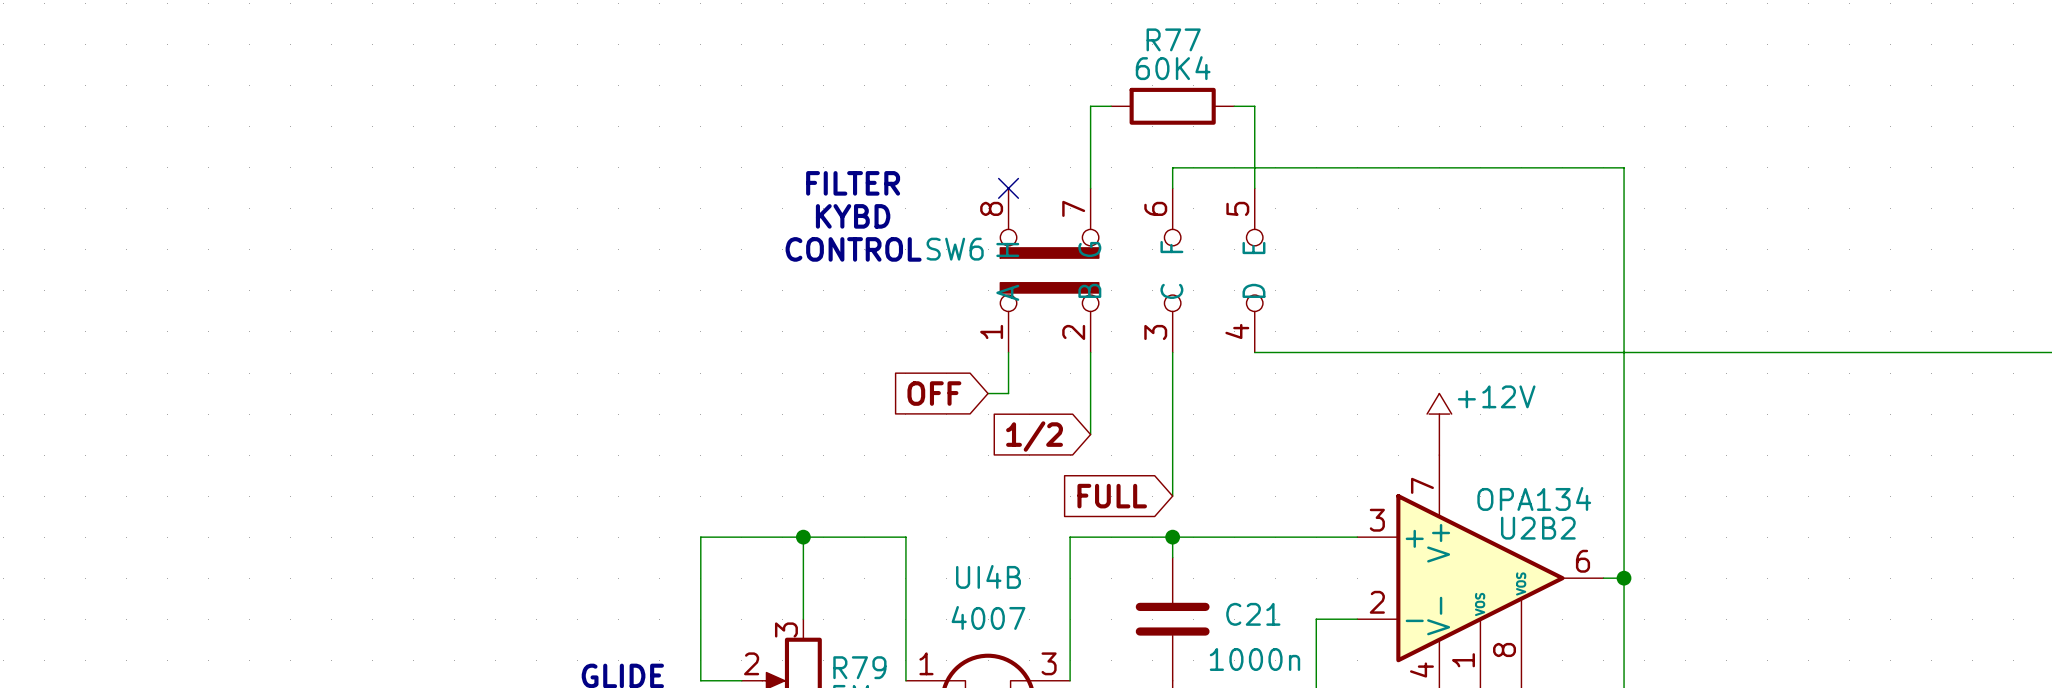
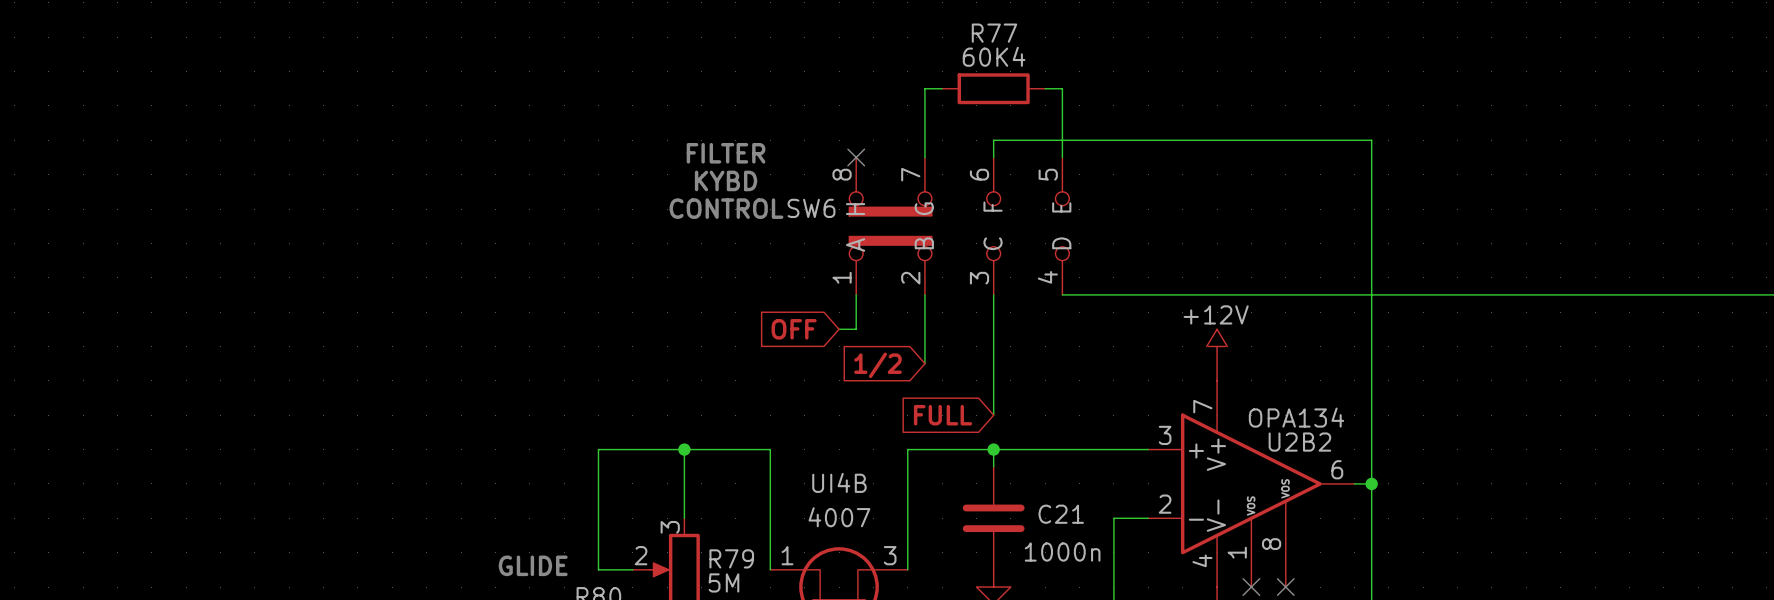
part value position: +12V (1496, 396) -> +12V (1216, 314)

